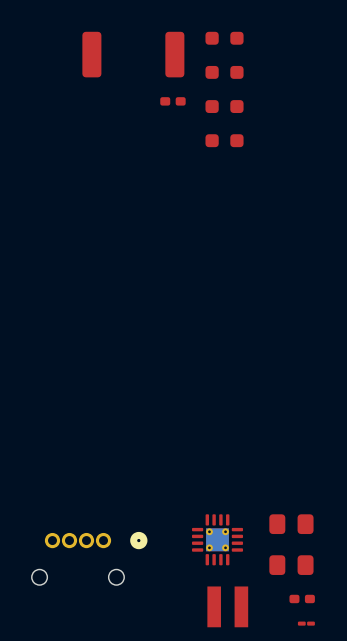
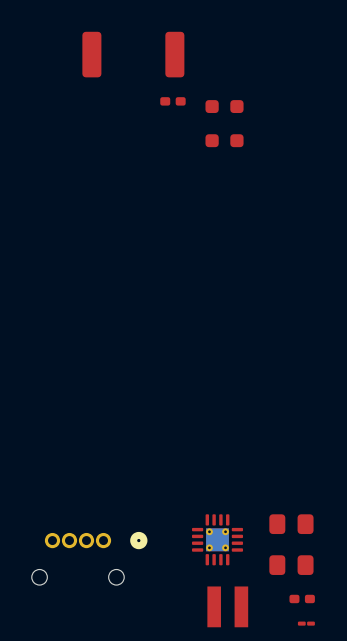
part: (224, 38) -> none
part: (224, 72) -> none

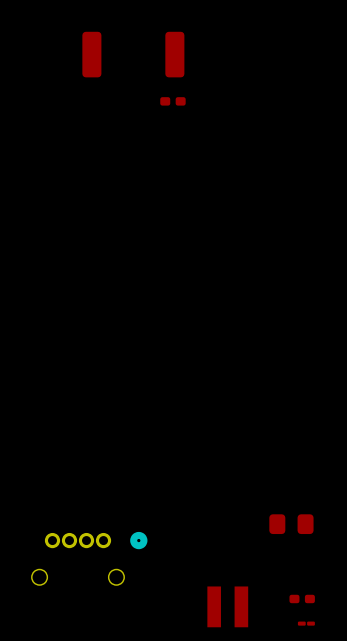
part: (224, 106) -> none
part: (224, 140) -> none
part: (217, 539) -> none
part: (291, 565) -> none

